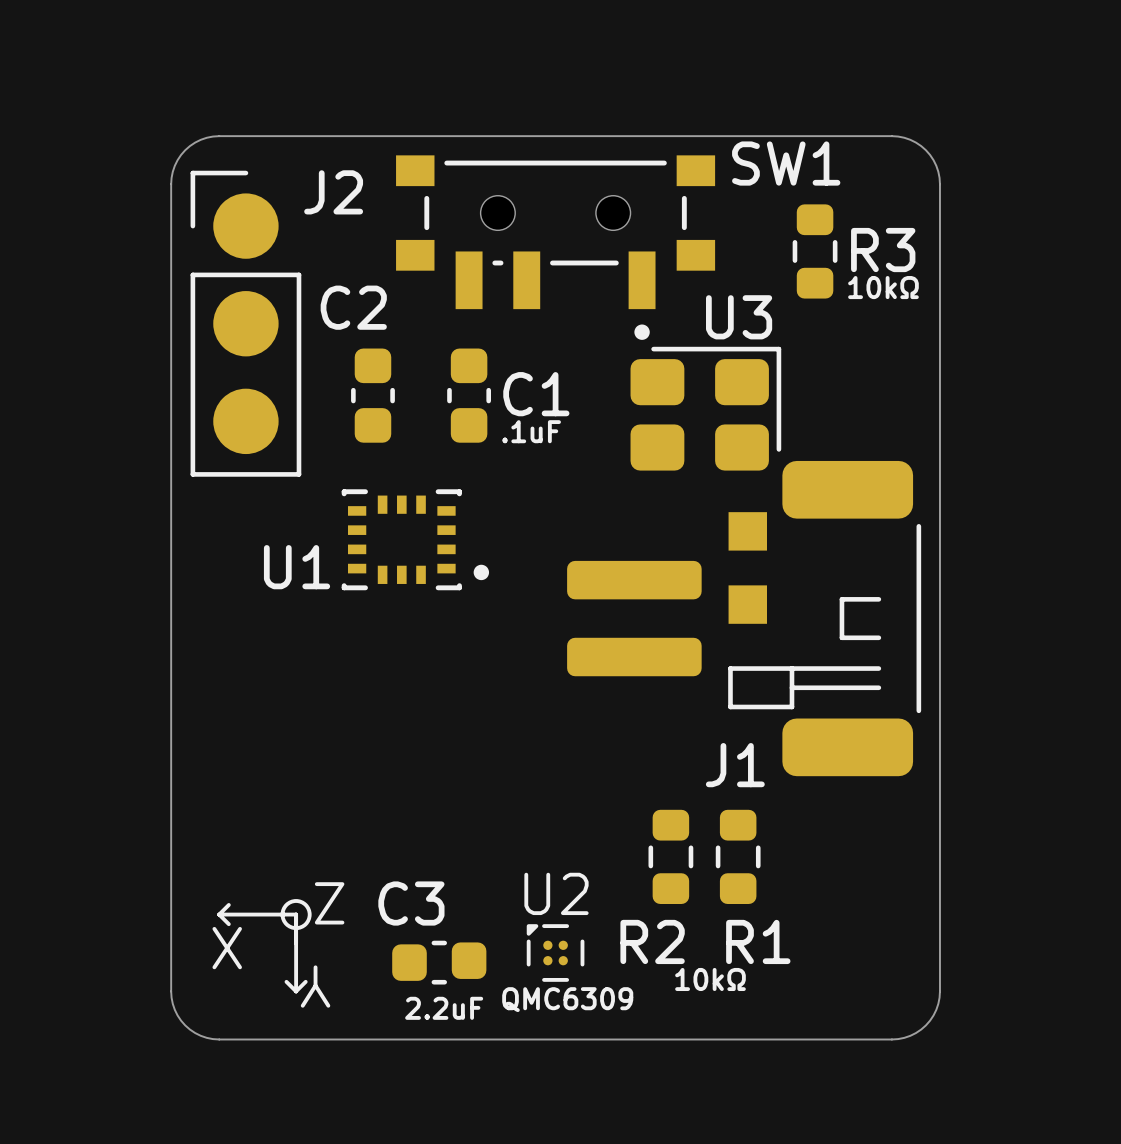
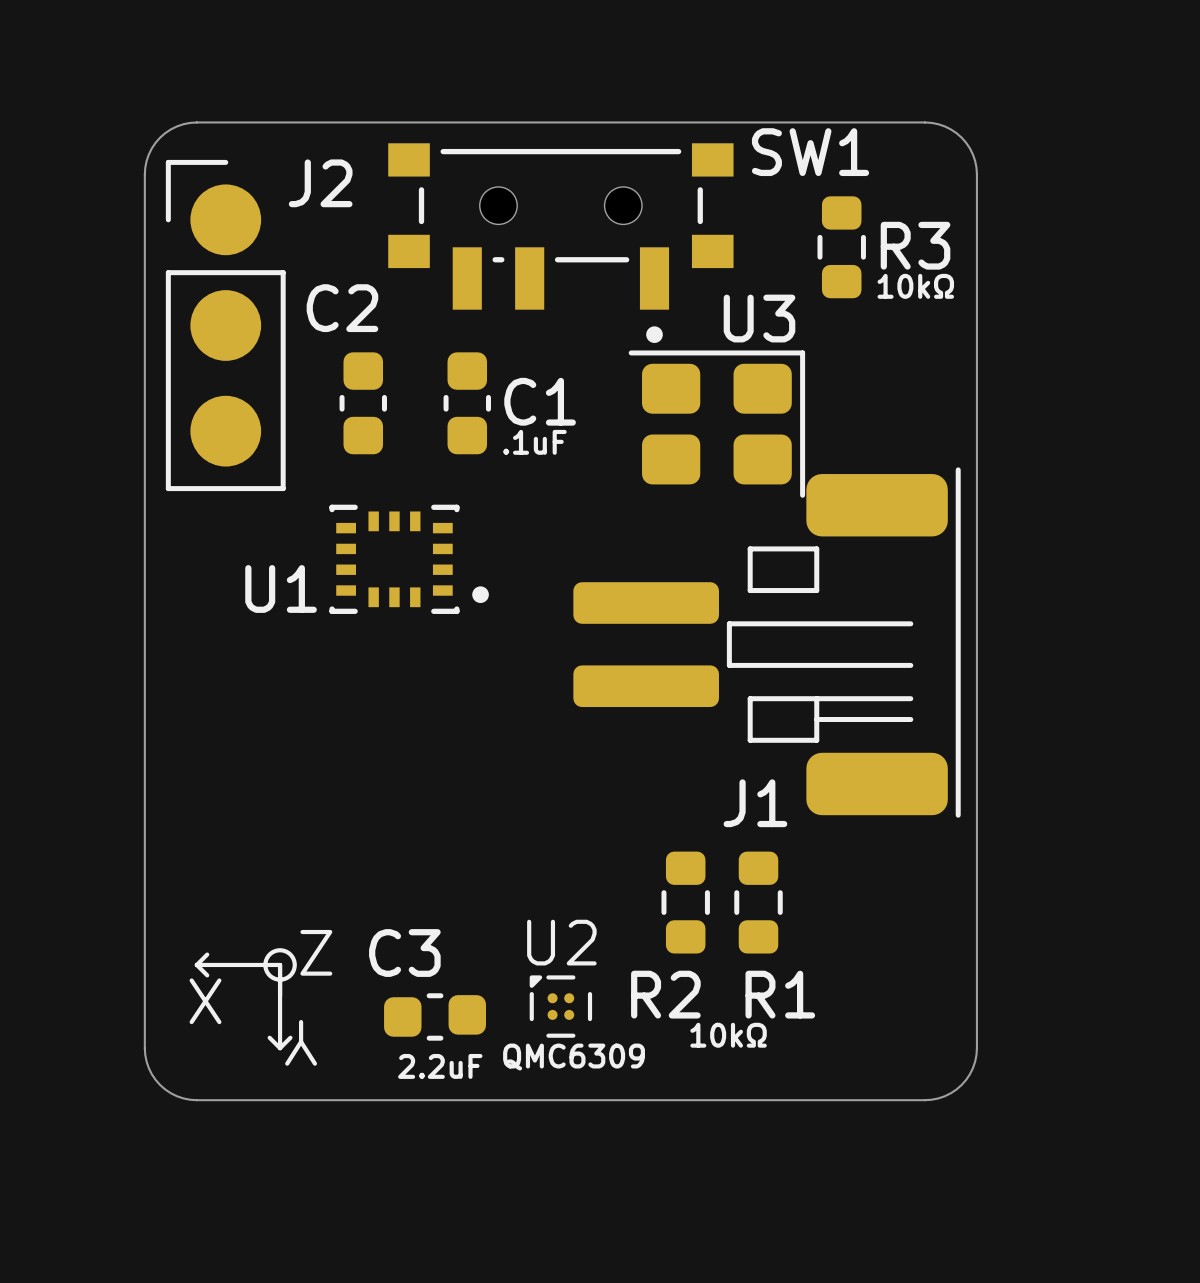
U3 footprint: [630, 346, 782, 471] -> [628, 350, 806, 498]
J1 footprint: [567, 460, 922, 777] -> [573, 467, 961, 818]
part: (747, 531) -> none
part: (747, 604) -> none

